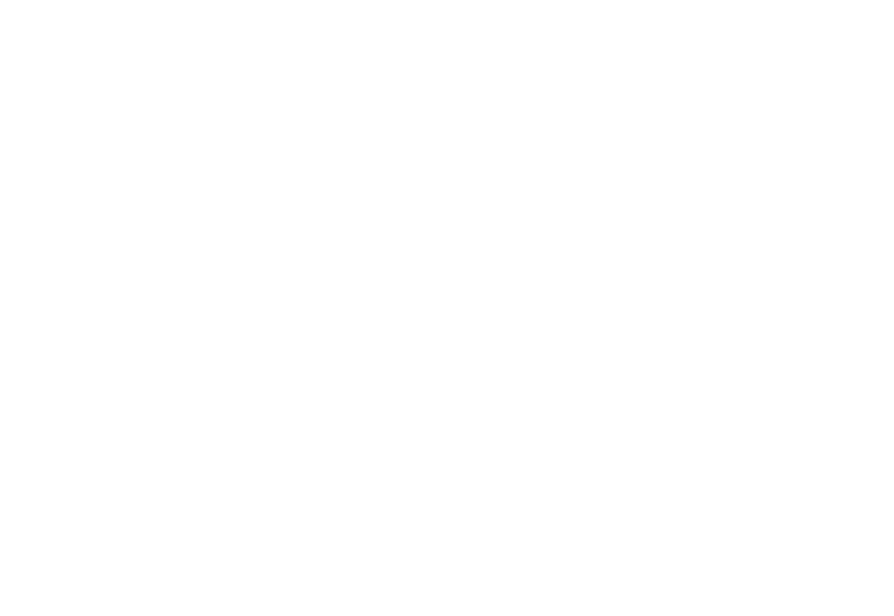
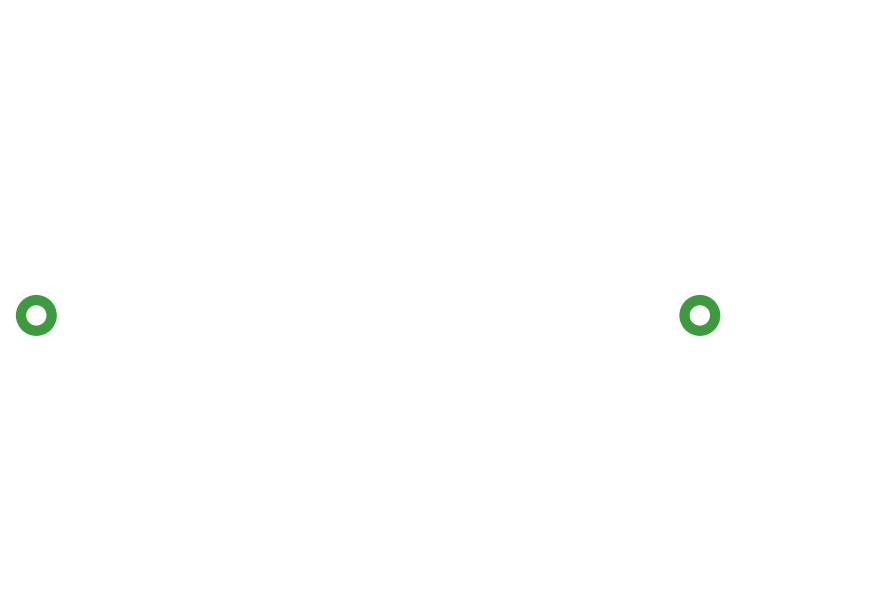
via: none -> (36, 315)
via: none -> (699, 315)

